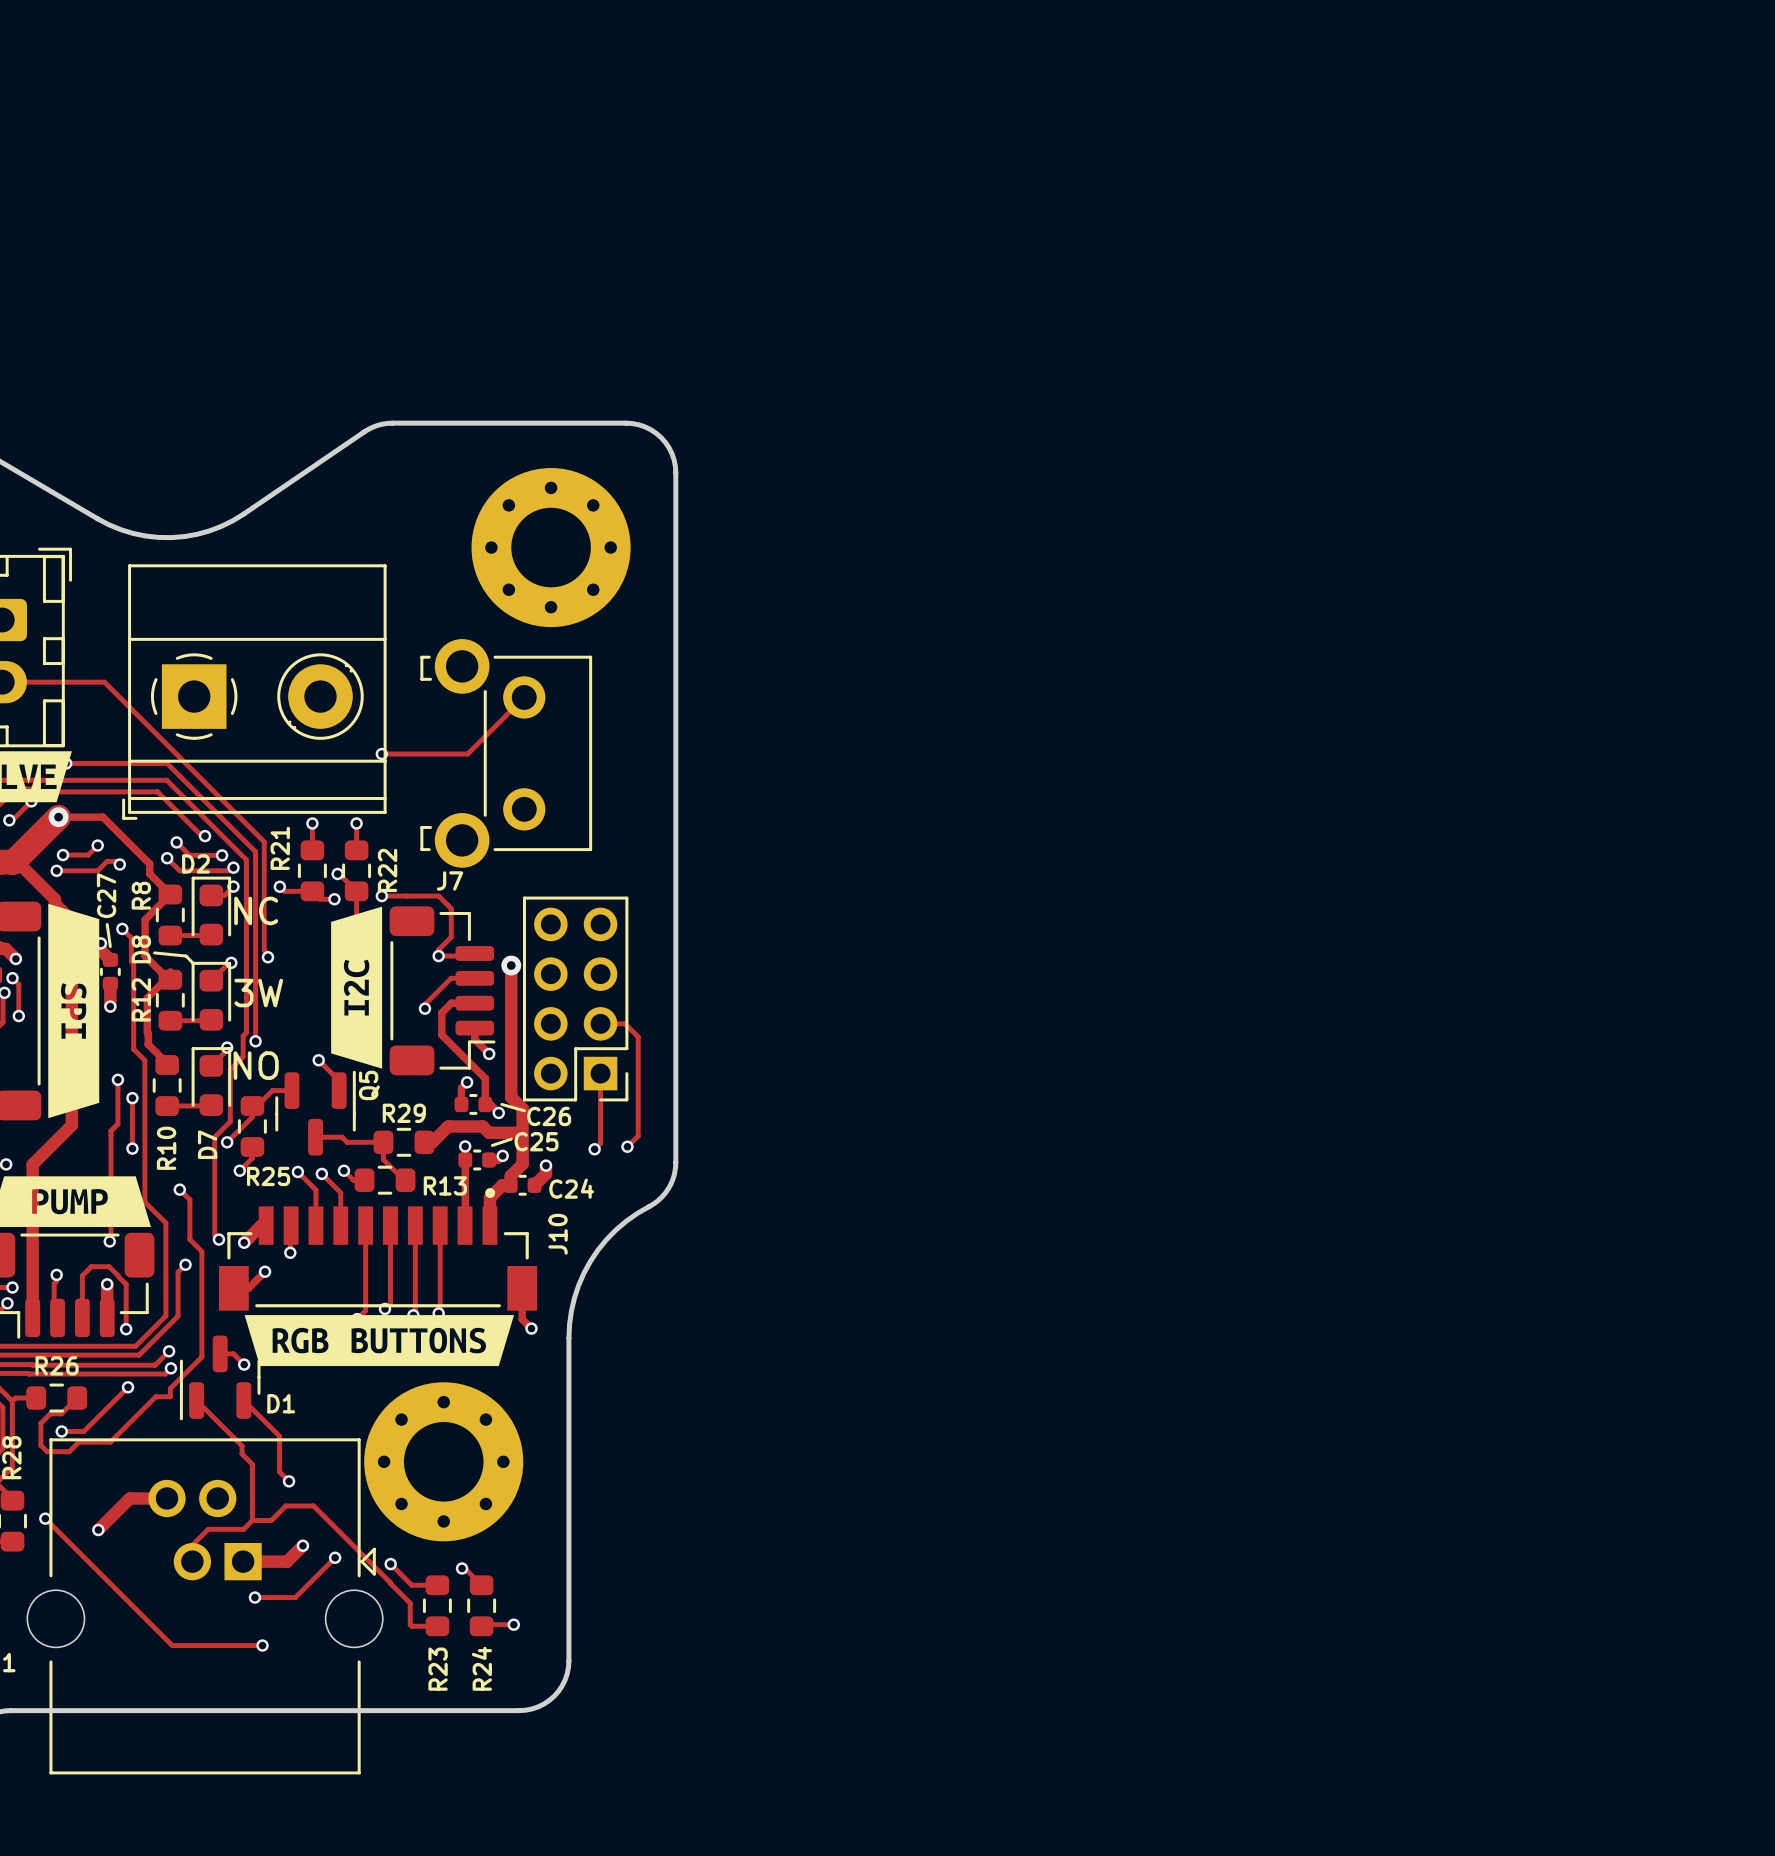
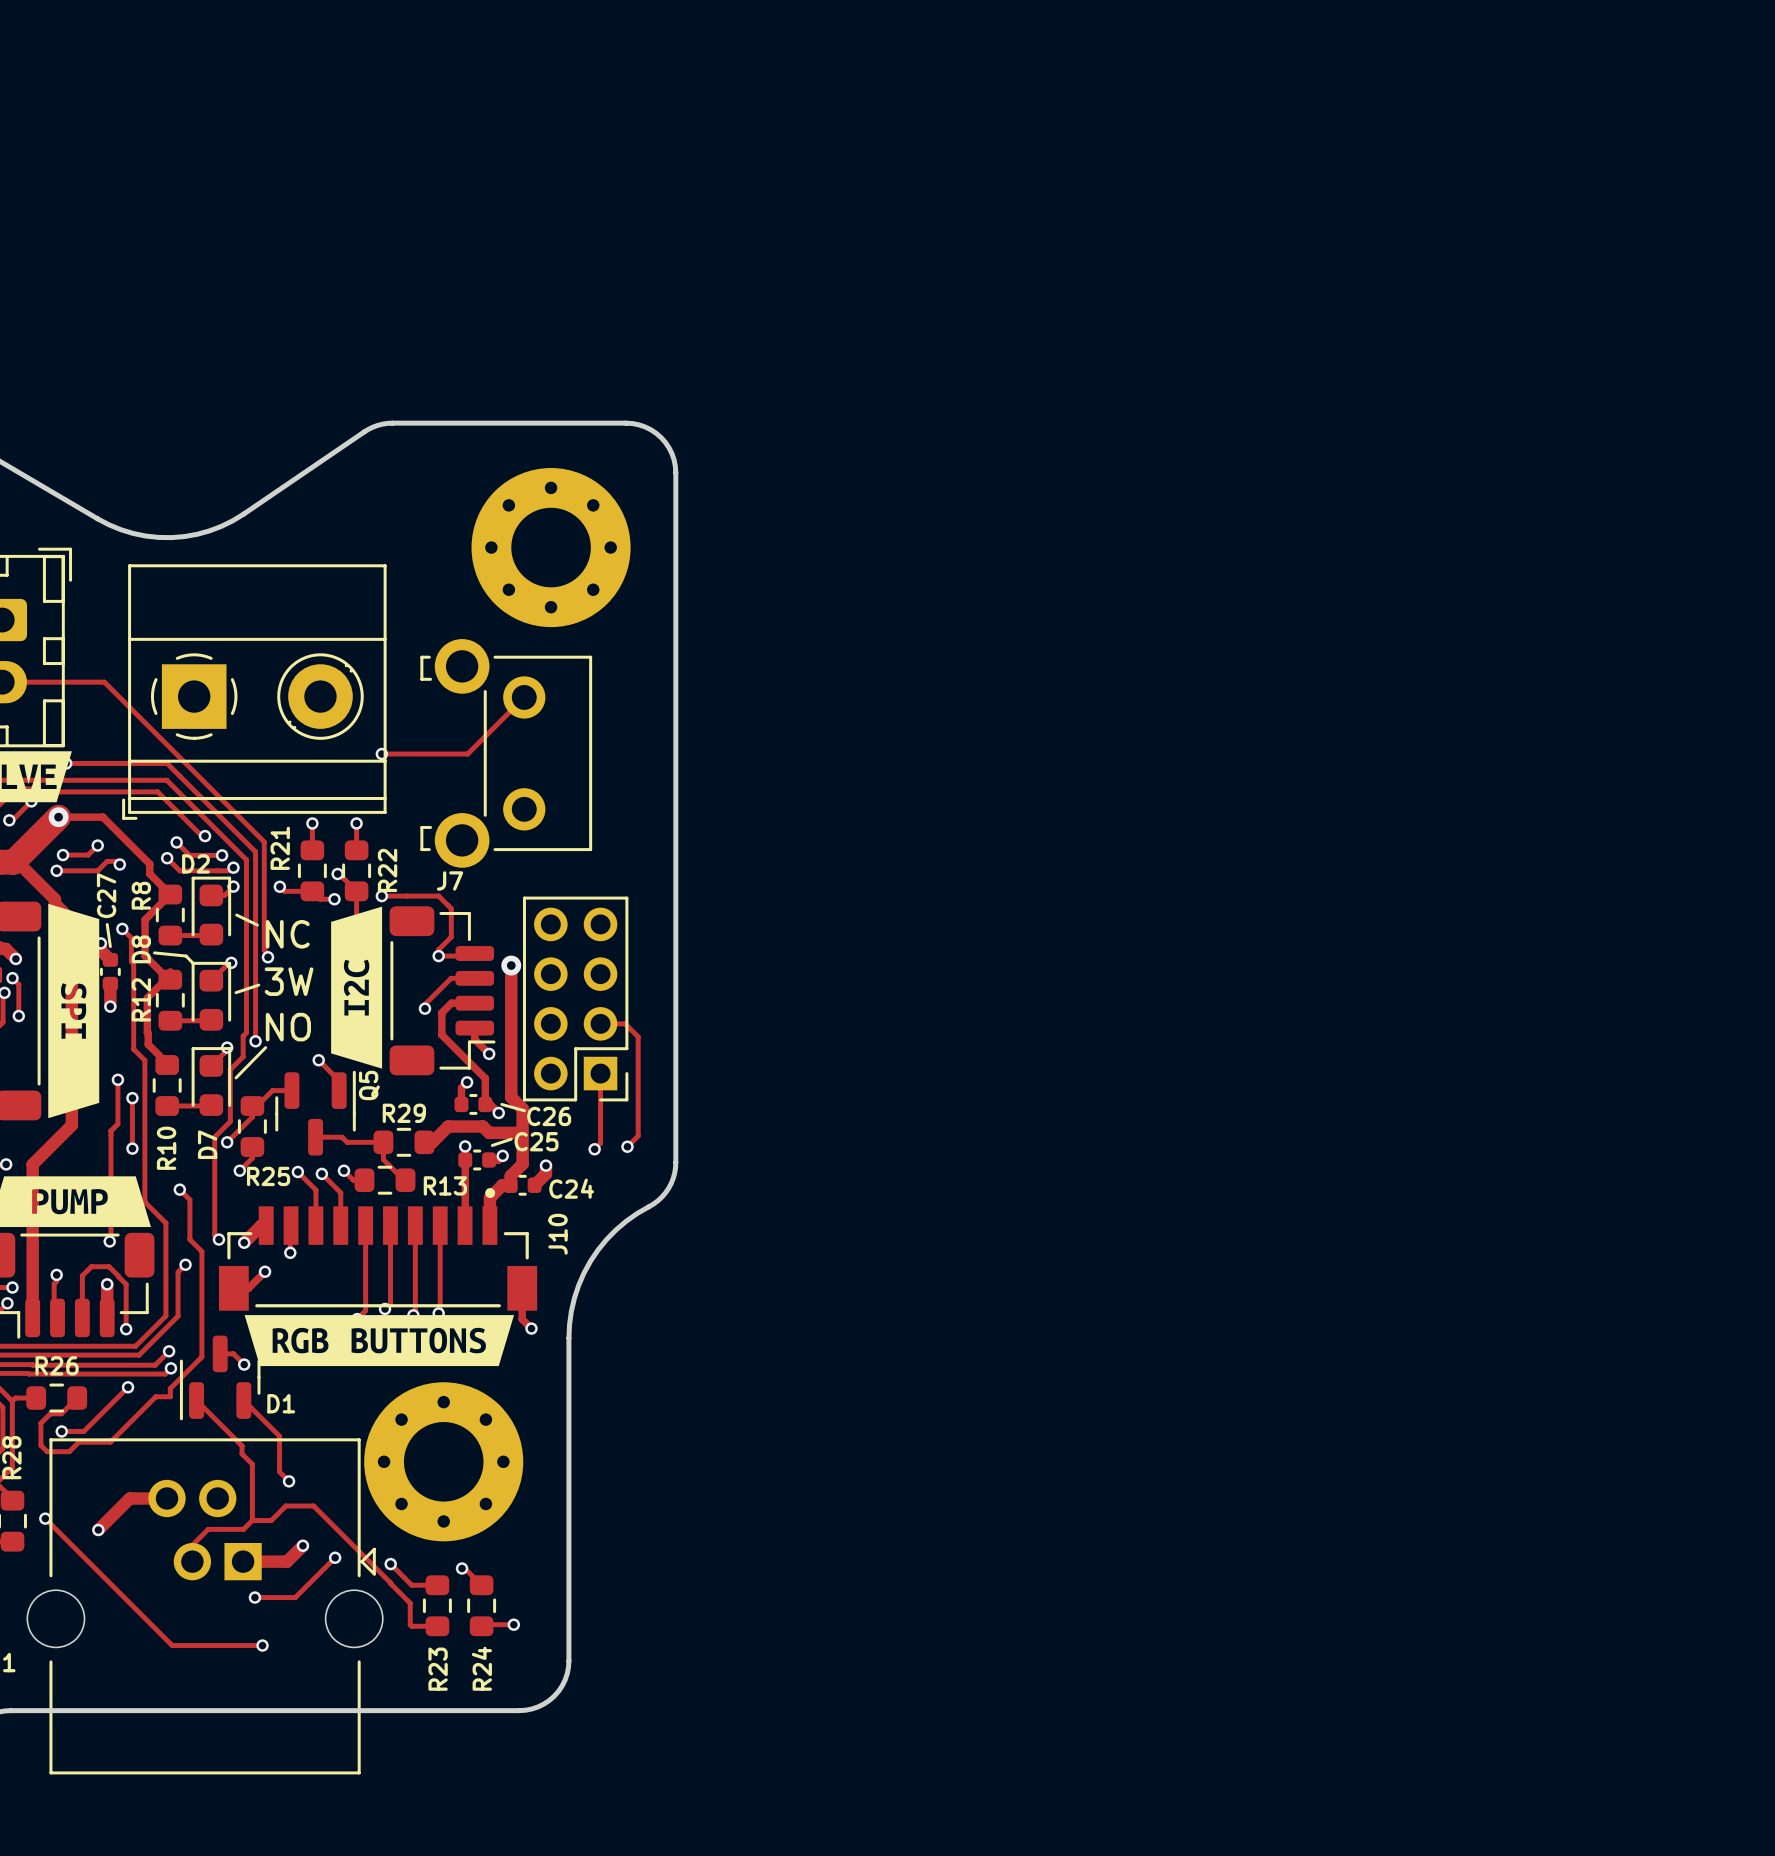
text position: NC (256, 910) -> NC (287, 934)
line: none -> (236, 915) (257, 925)
line: none -> (258, 985) (236, 992)
text position: 3W (258, 993) -> 3W (289, 981)
line: none -> (265, 1047) (236, 1077)
text position: NO (256, 1065) -> NO (288, 1027)

